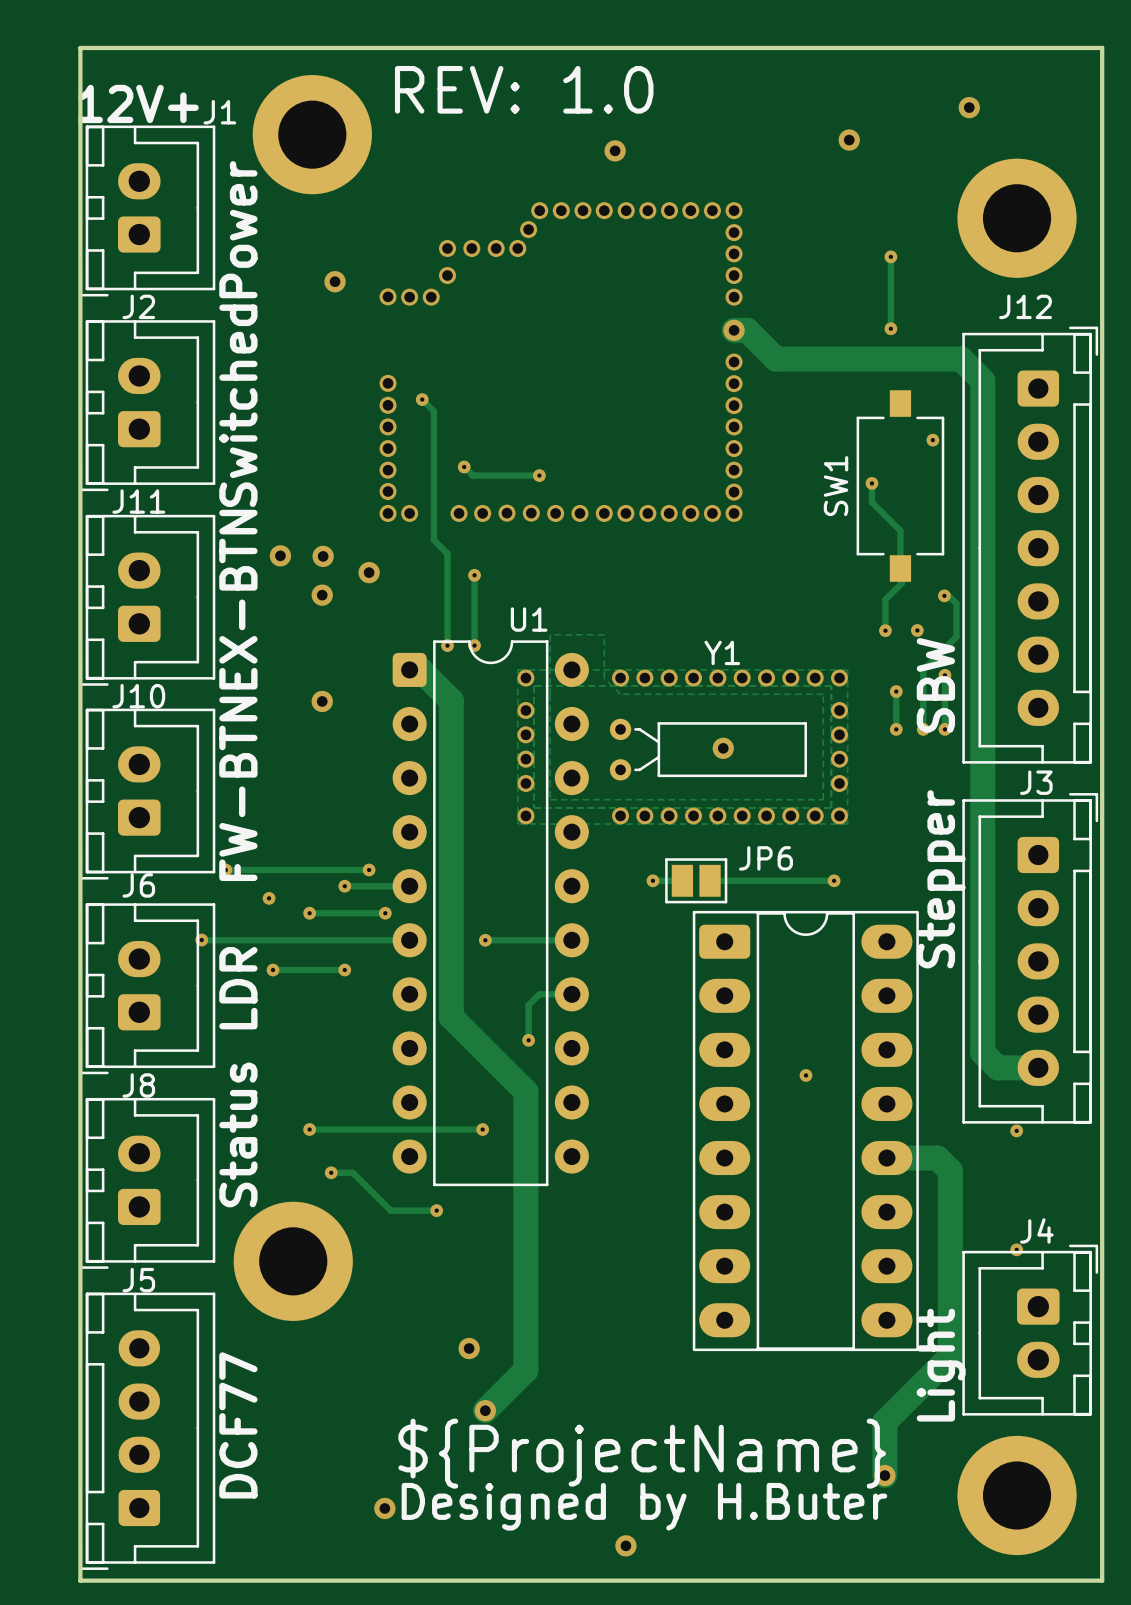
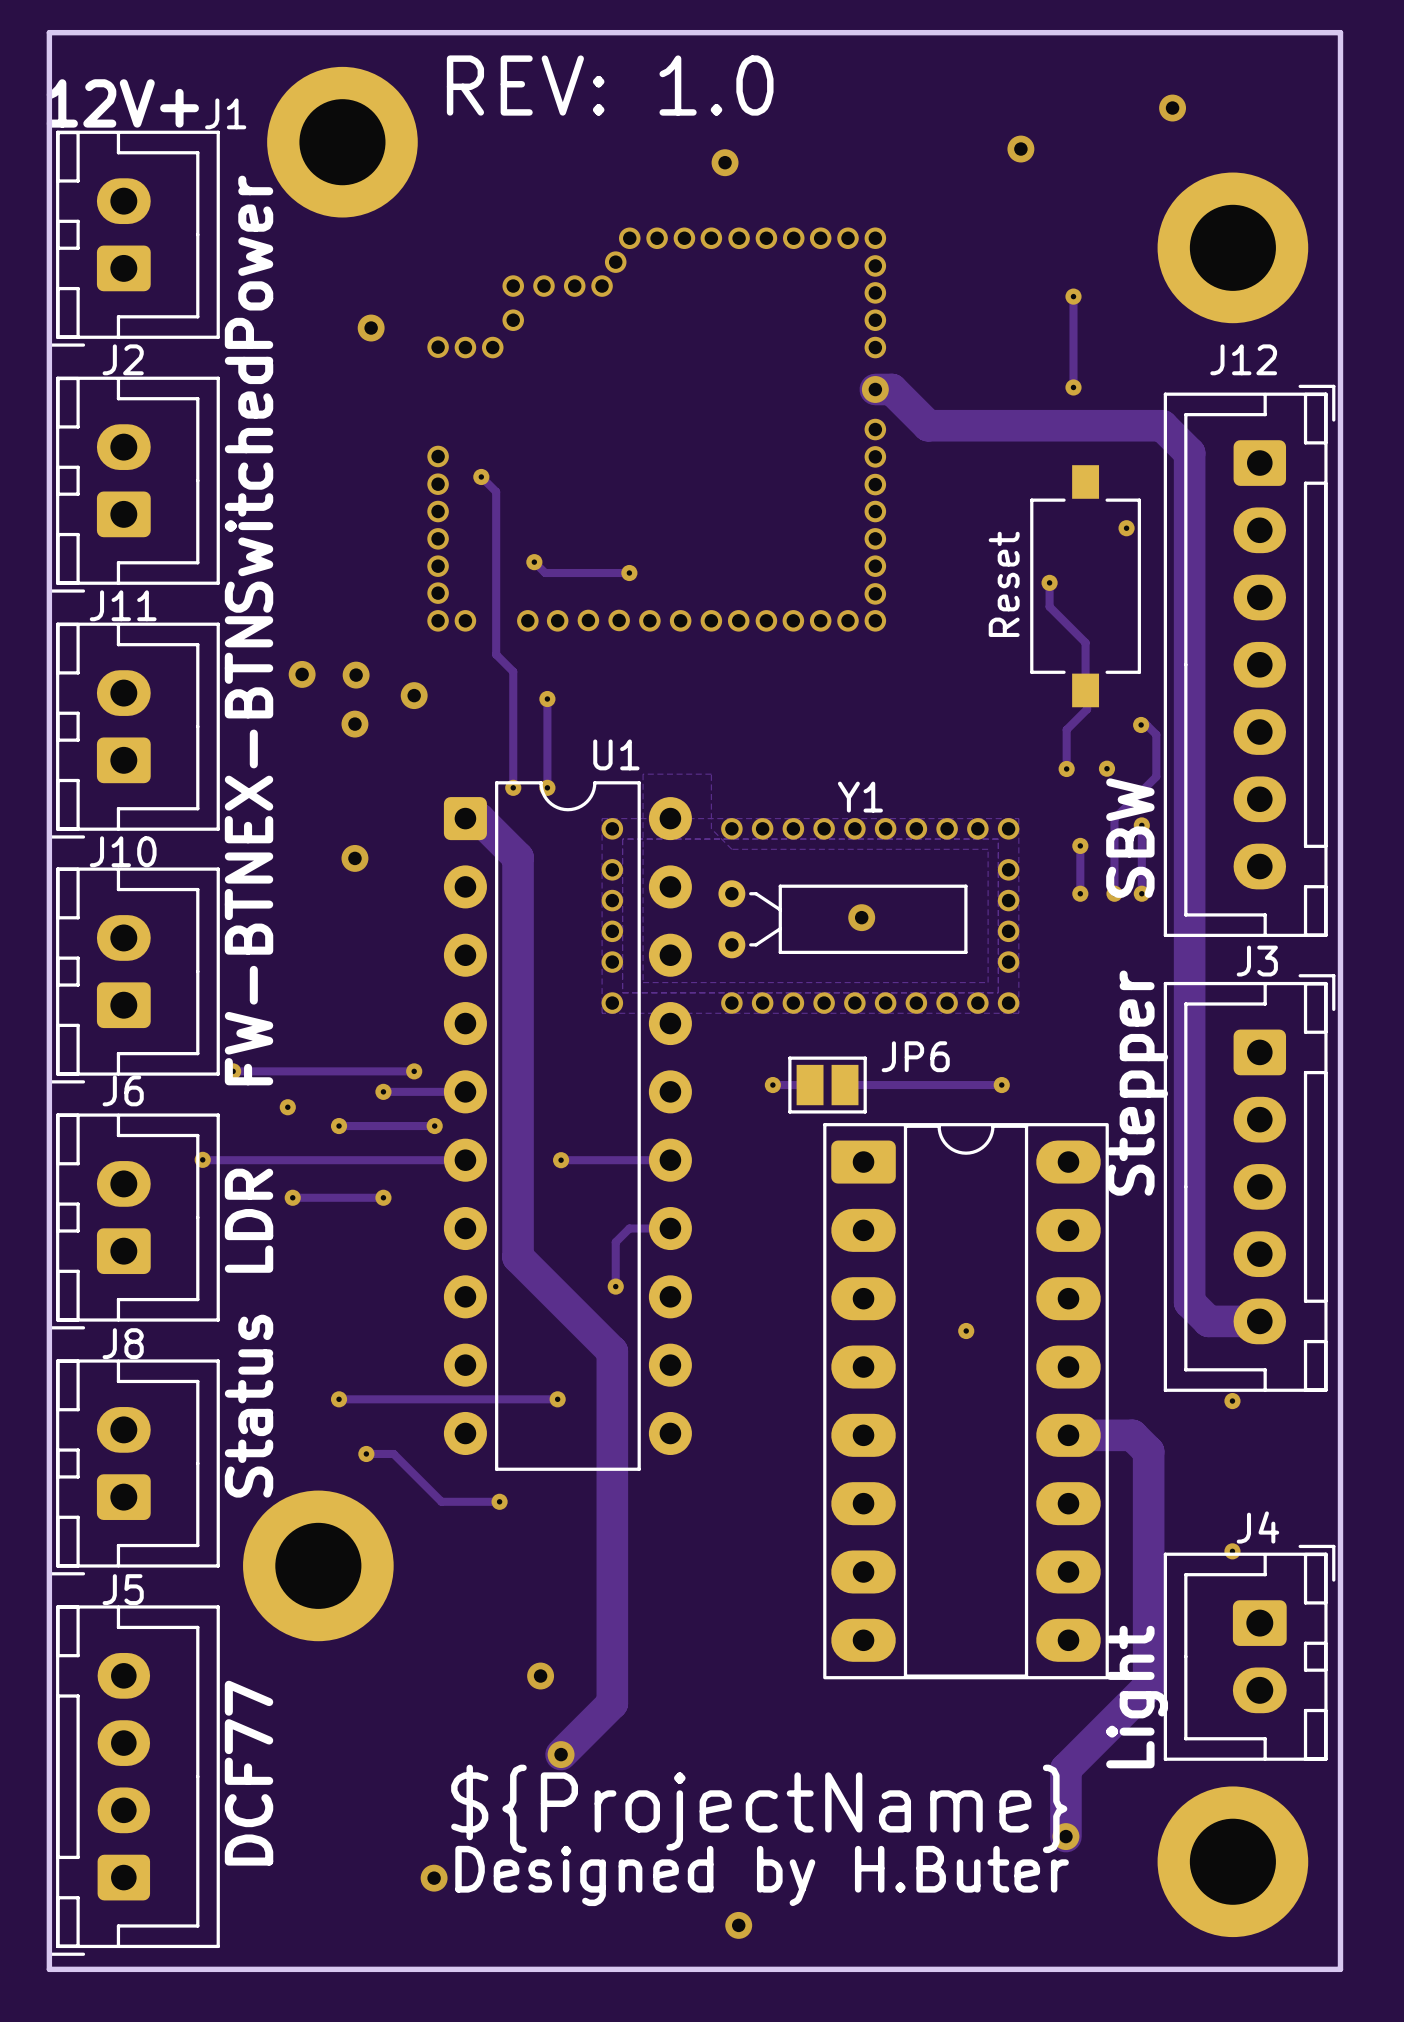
SW1 name: SW1 (836, 486) -> Reset (1004, 584)

